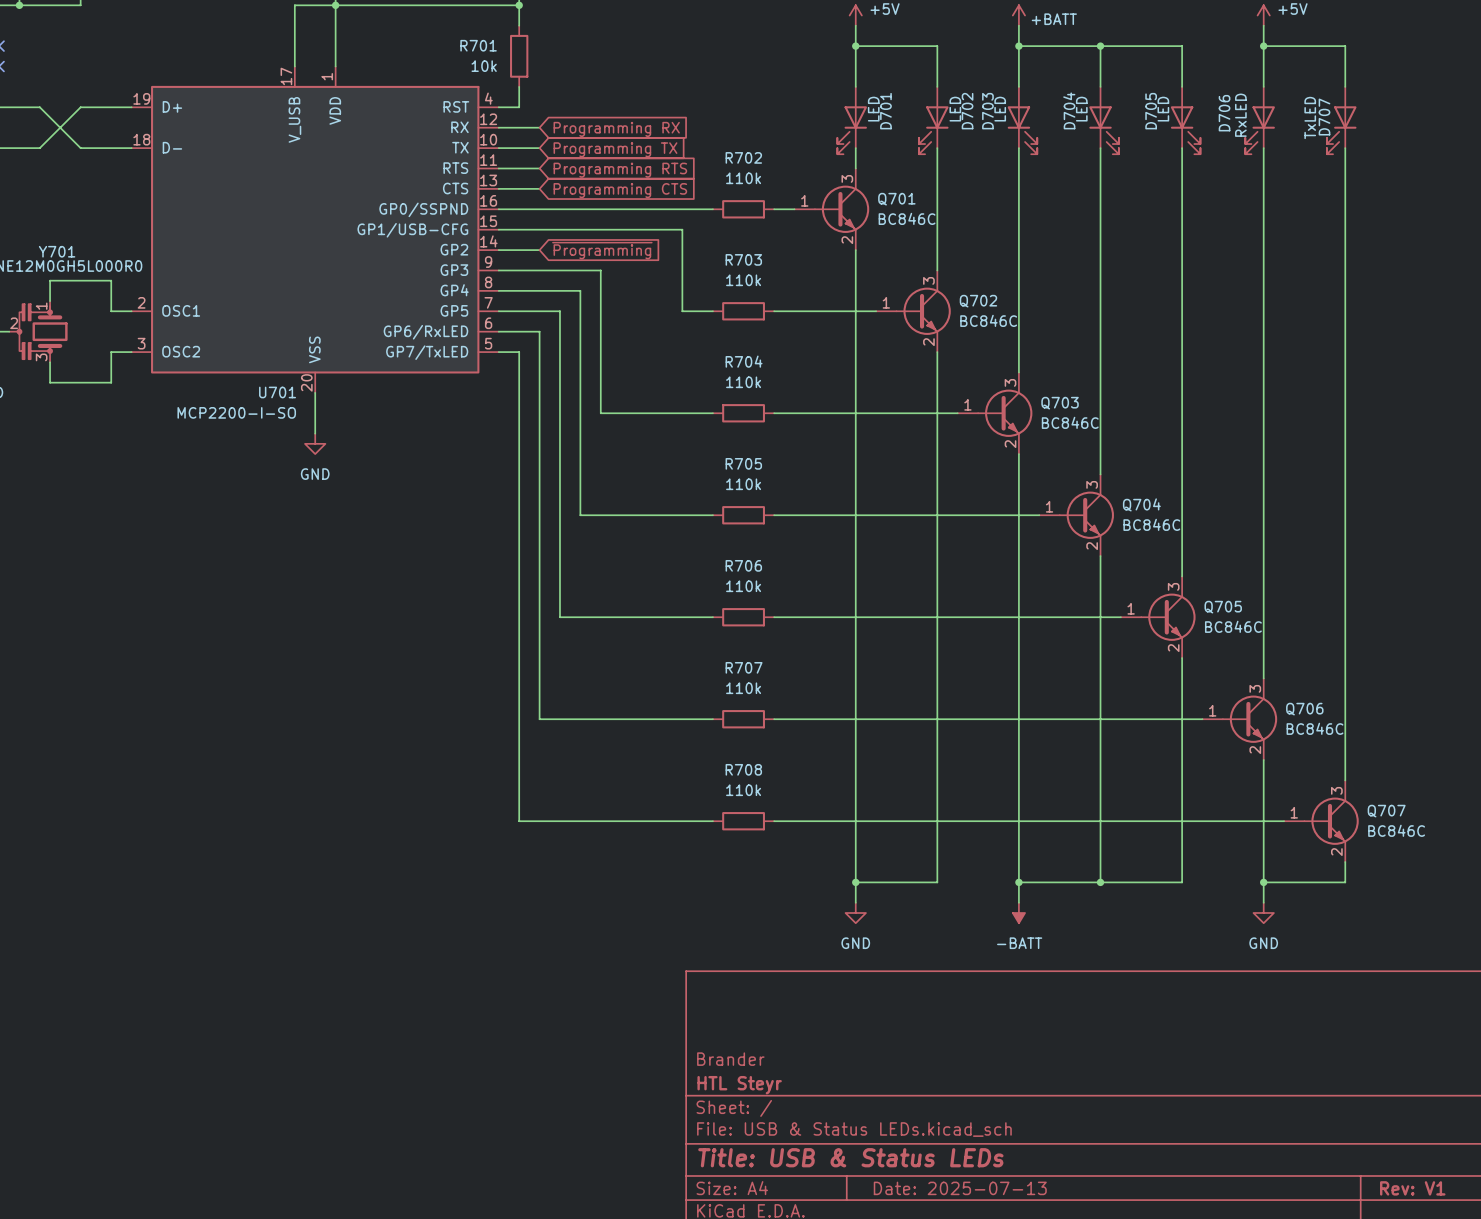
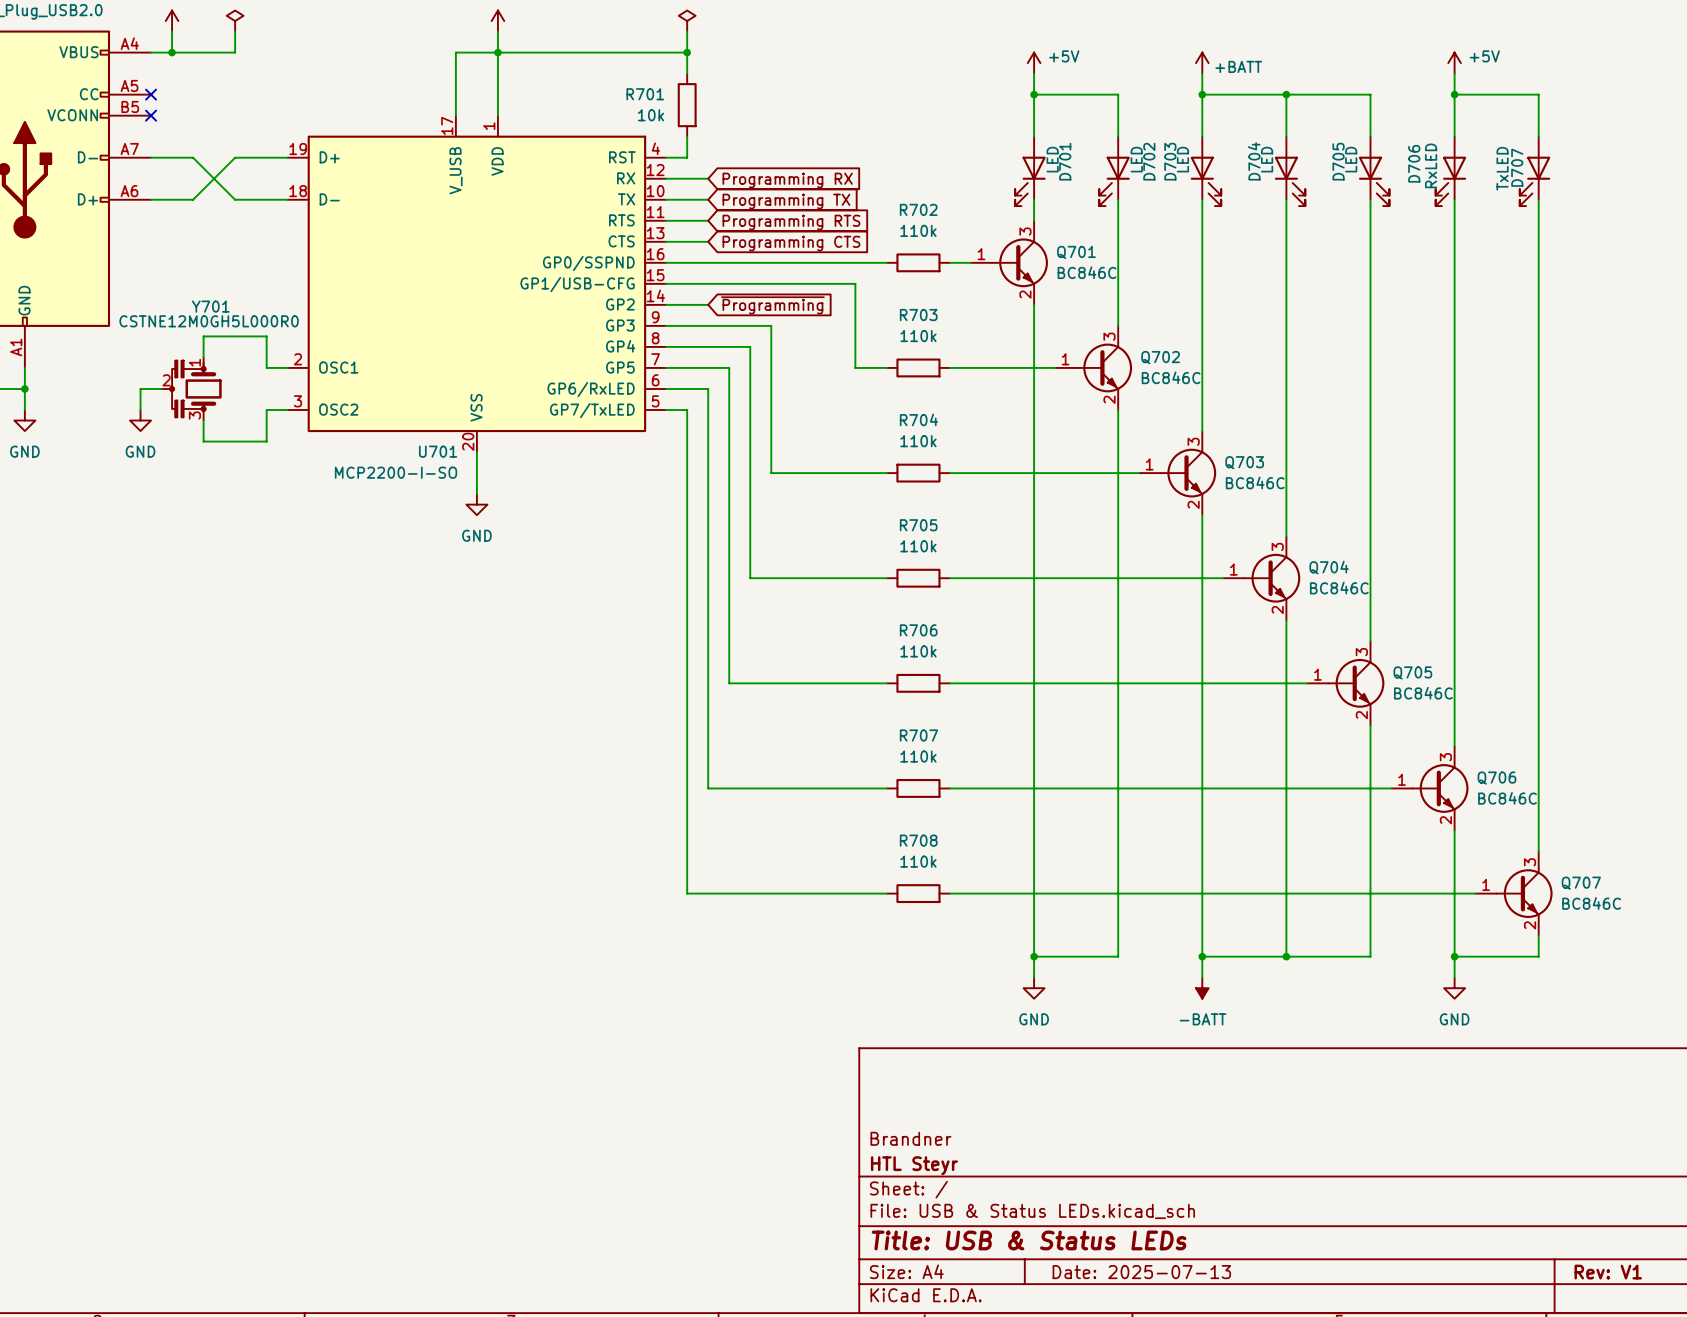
title block: Brander (730, 1059) -> Brandner (910, 1138)

